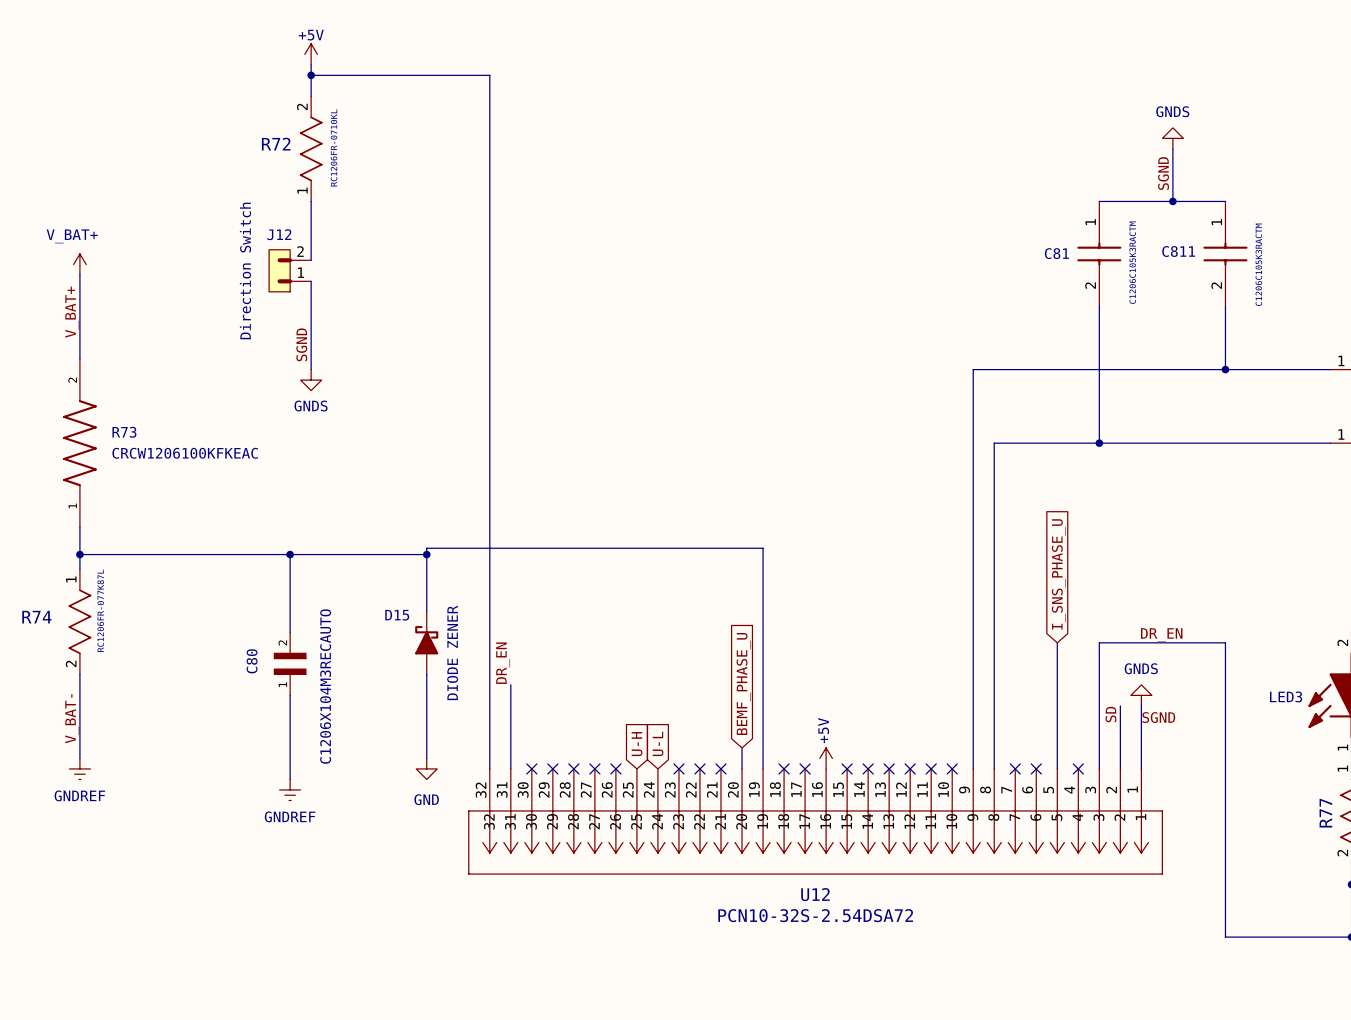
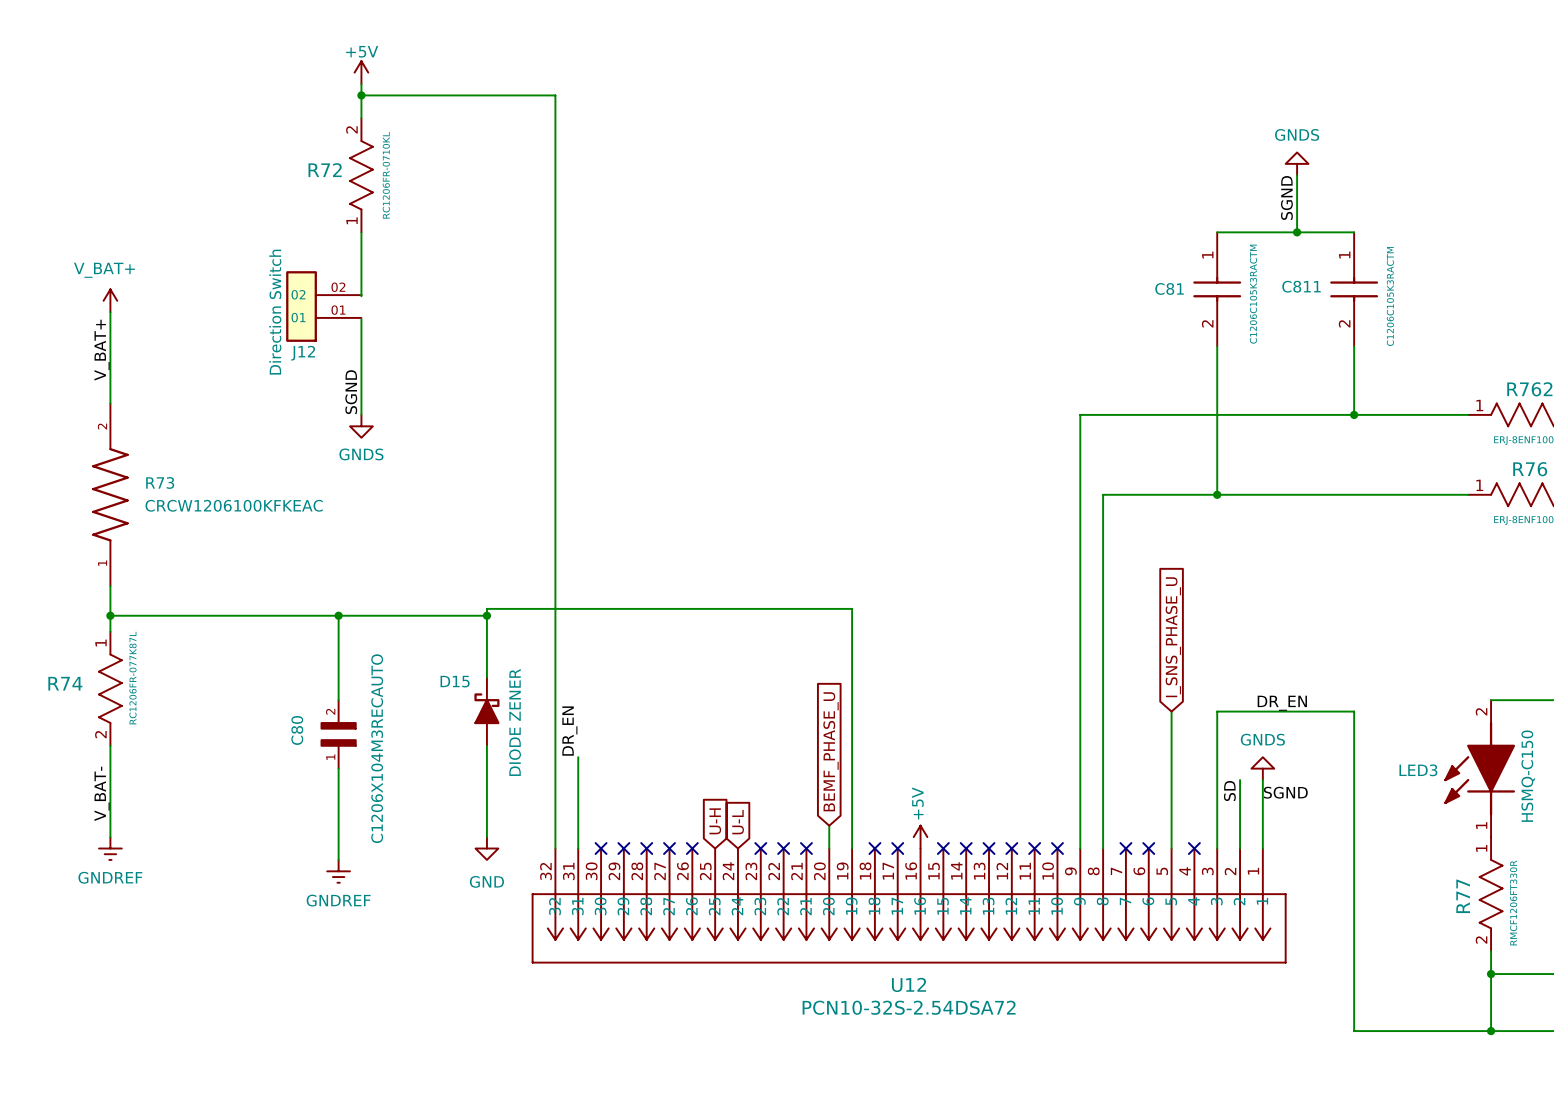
J12 name position: J12 (279, 234) -> J12 (303, 353)
J12 symbol: [269, 249, 312, 292] -> [286, 271, 362, 342]

